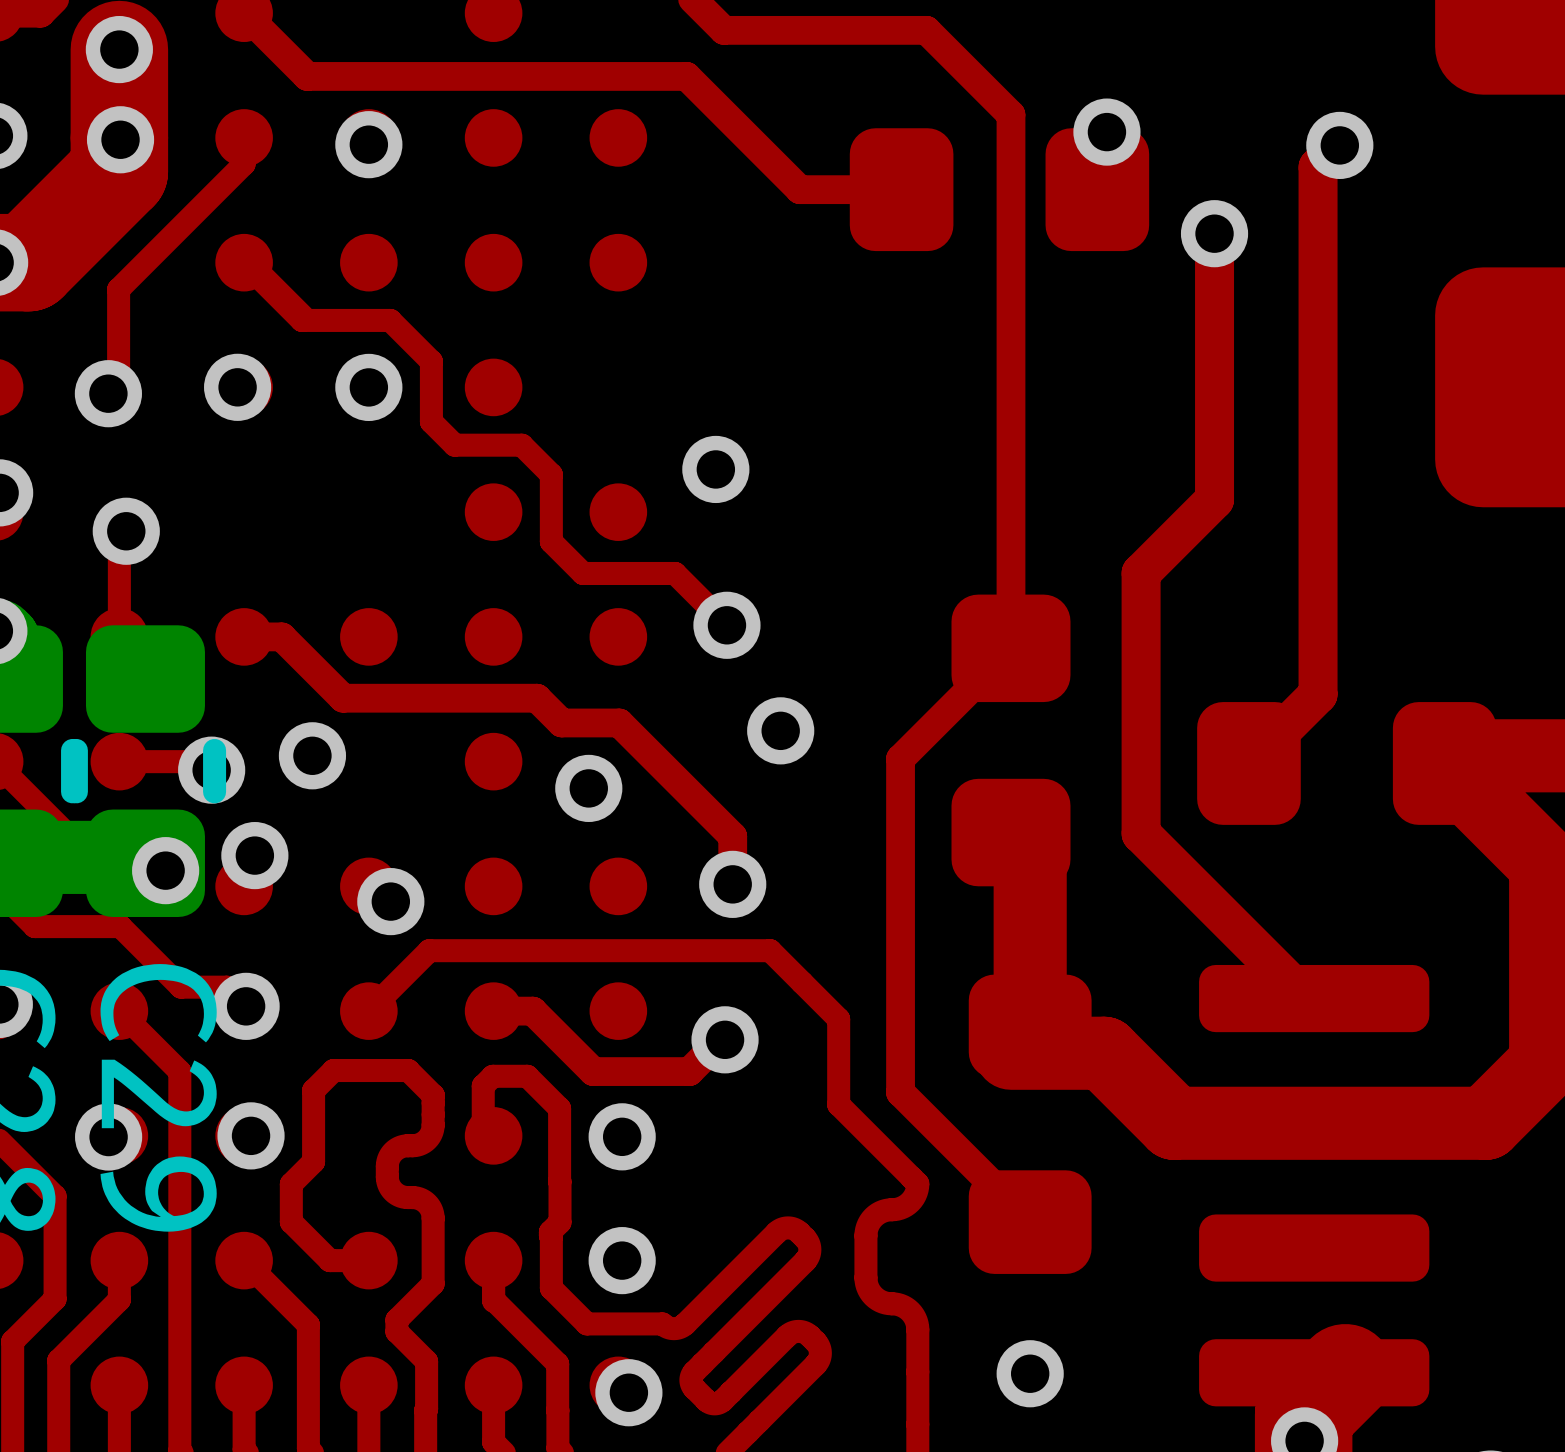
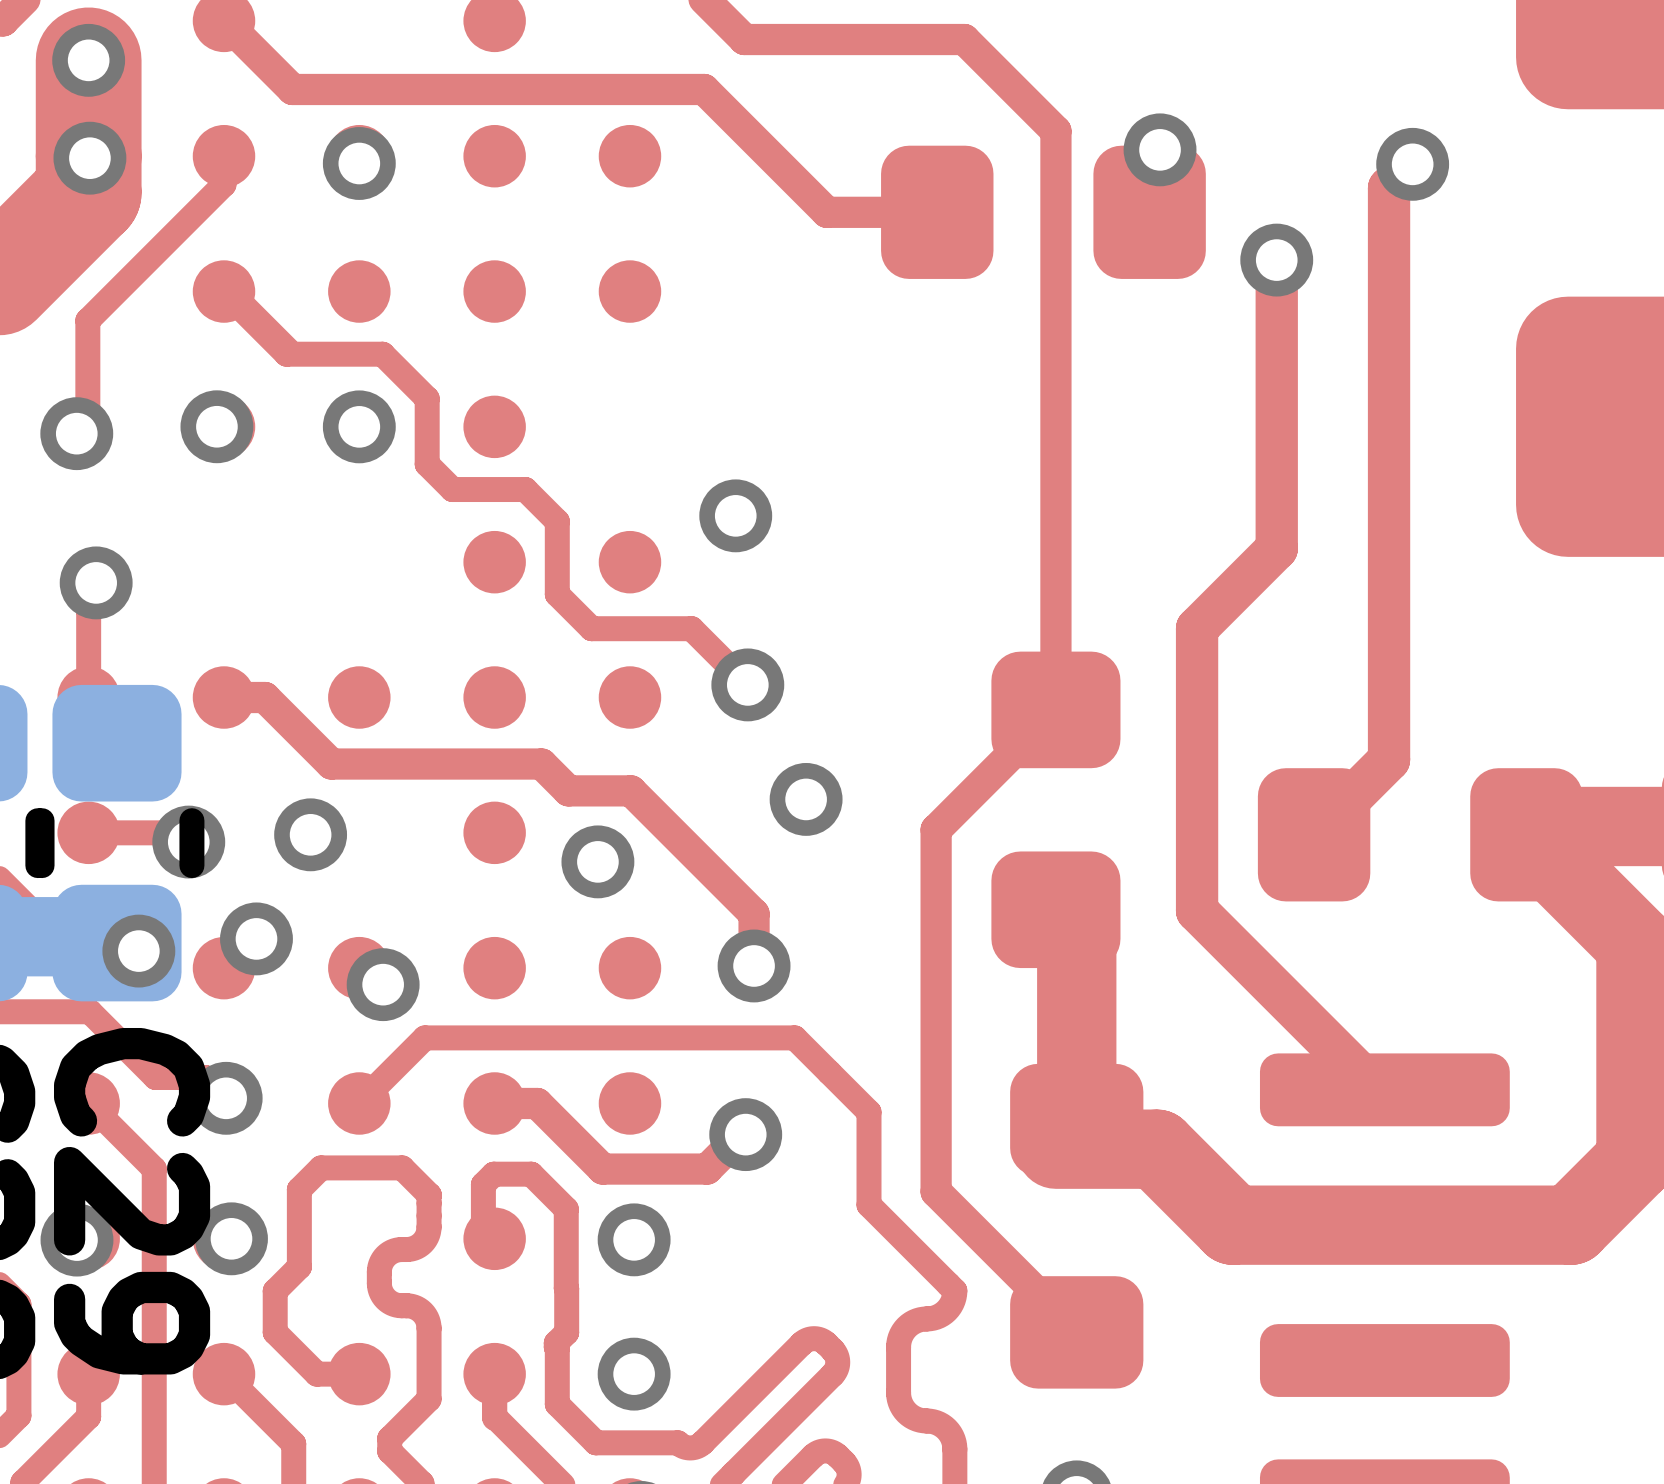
via position: (312, 755) -> (310, 834)
via position: (254, 855) -> (256, 938)

